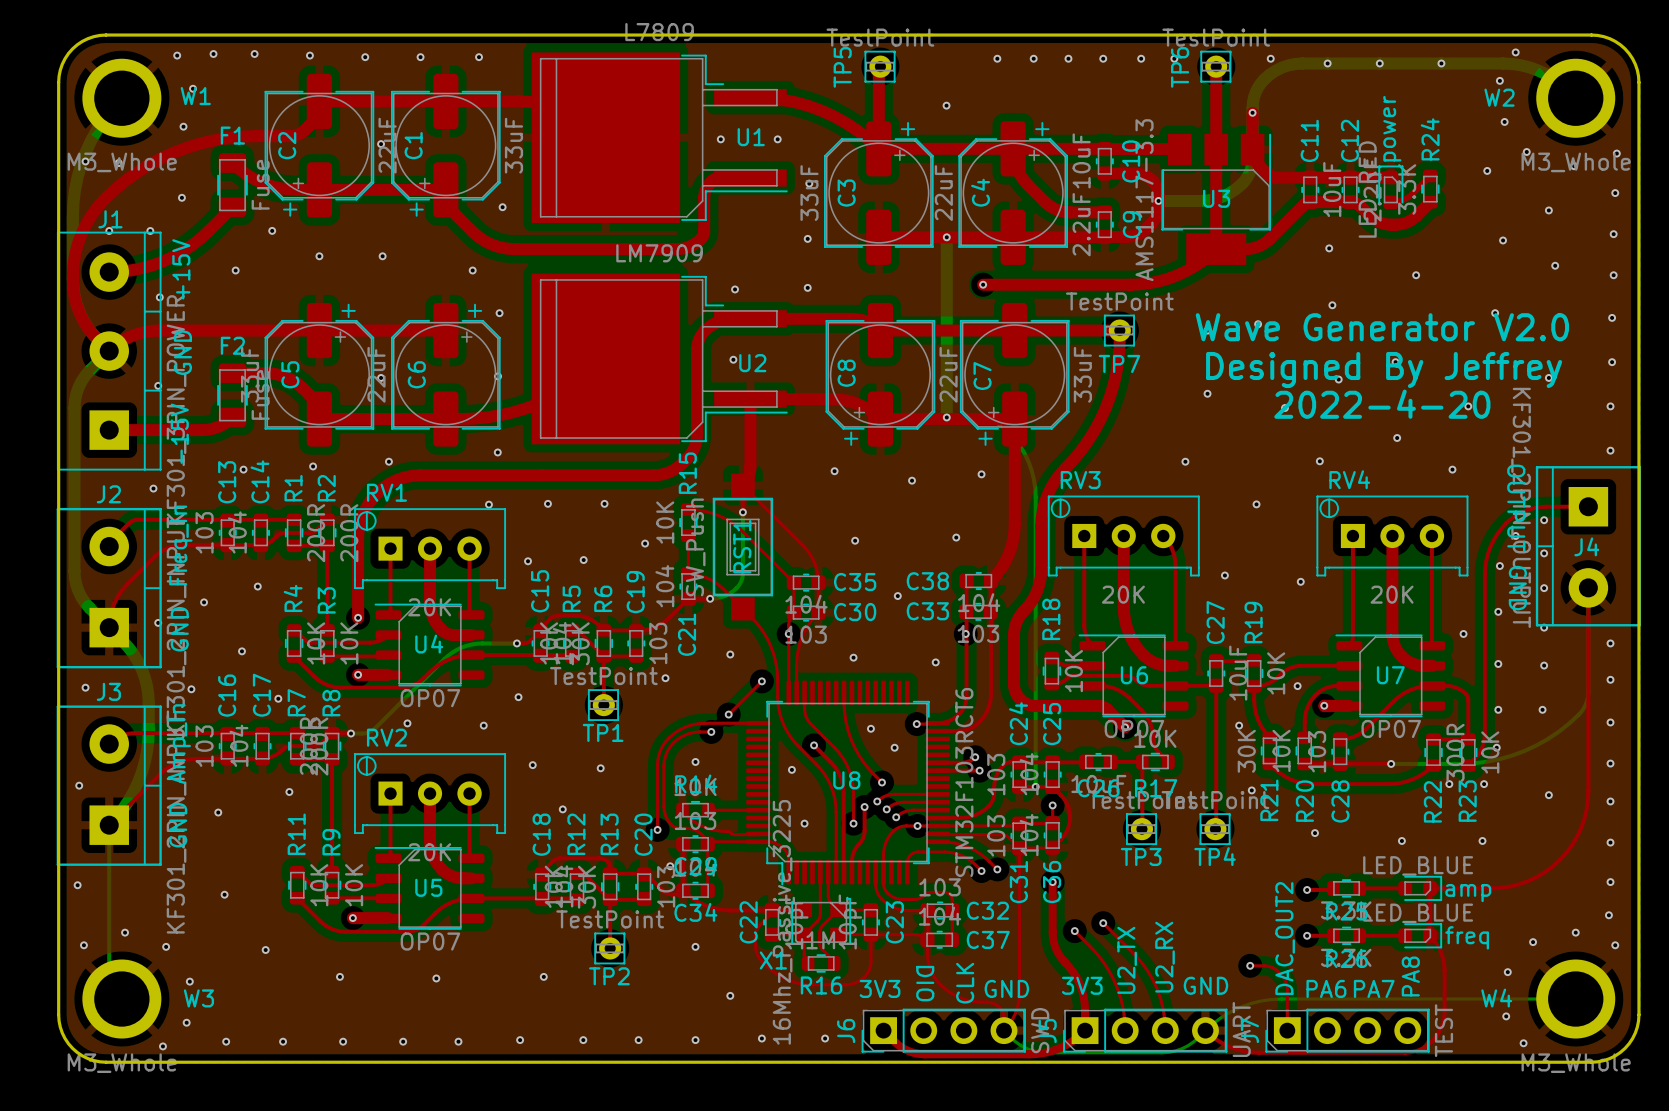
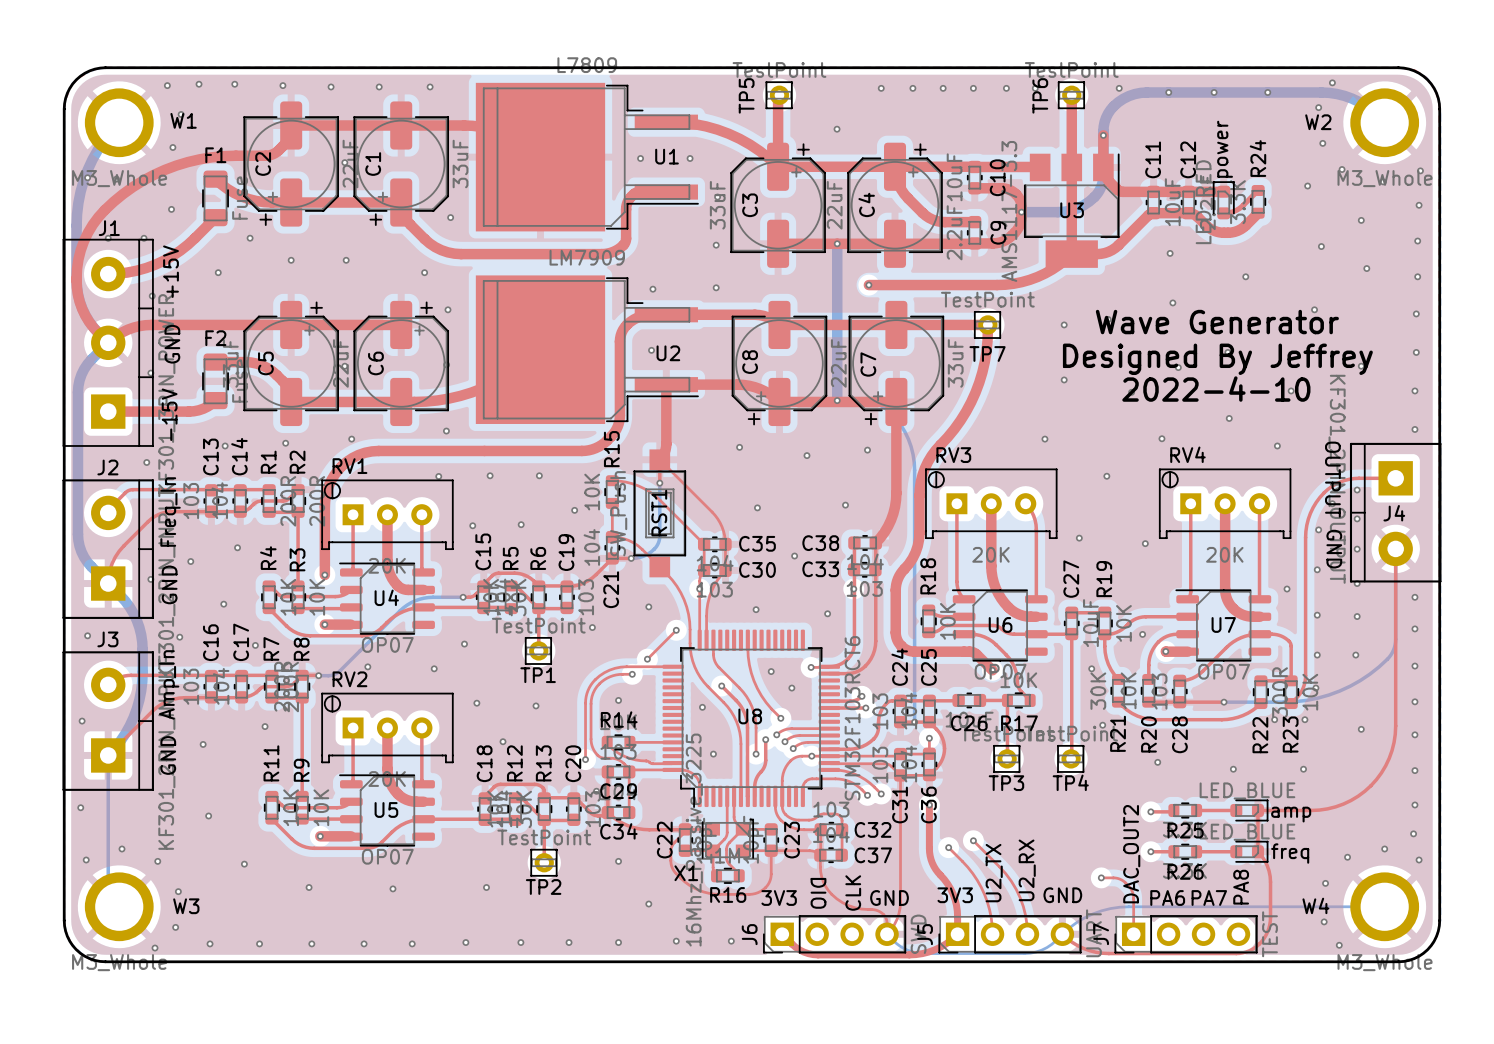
text: Wave Generator V2.0 (1382, 327) -> Wave Generator (1217, 322)
text: 2022-4-20 (1382, 404) -> 2022-4-10 (1216, 389)

